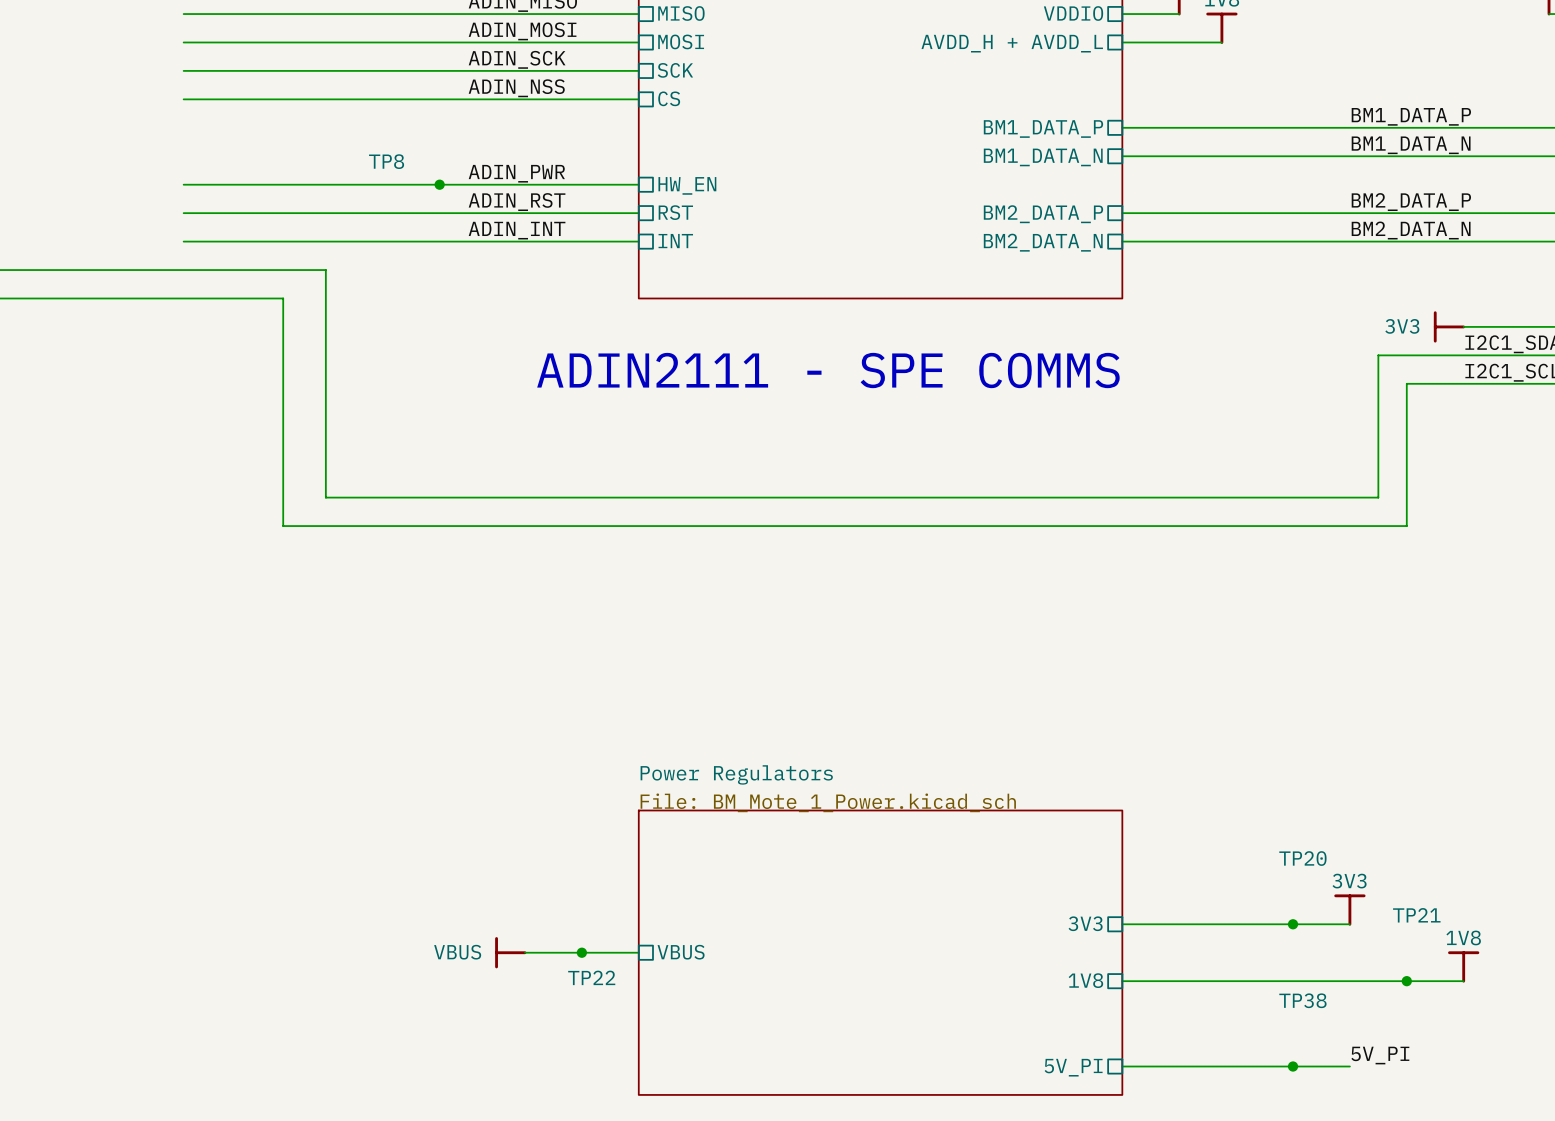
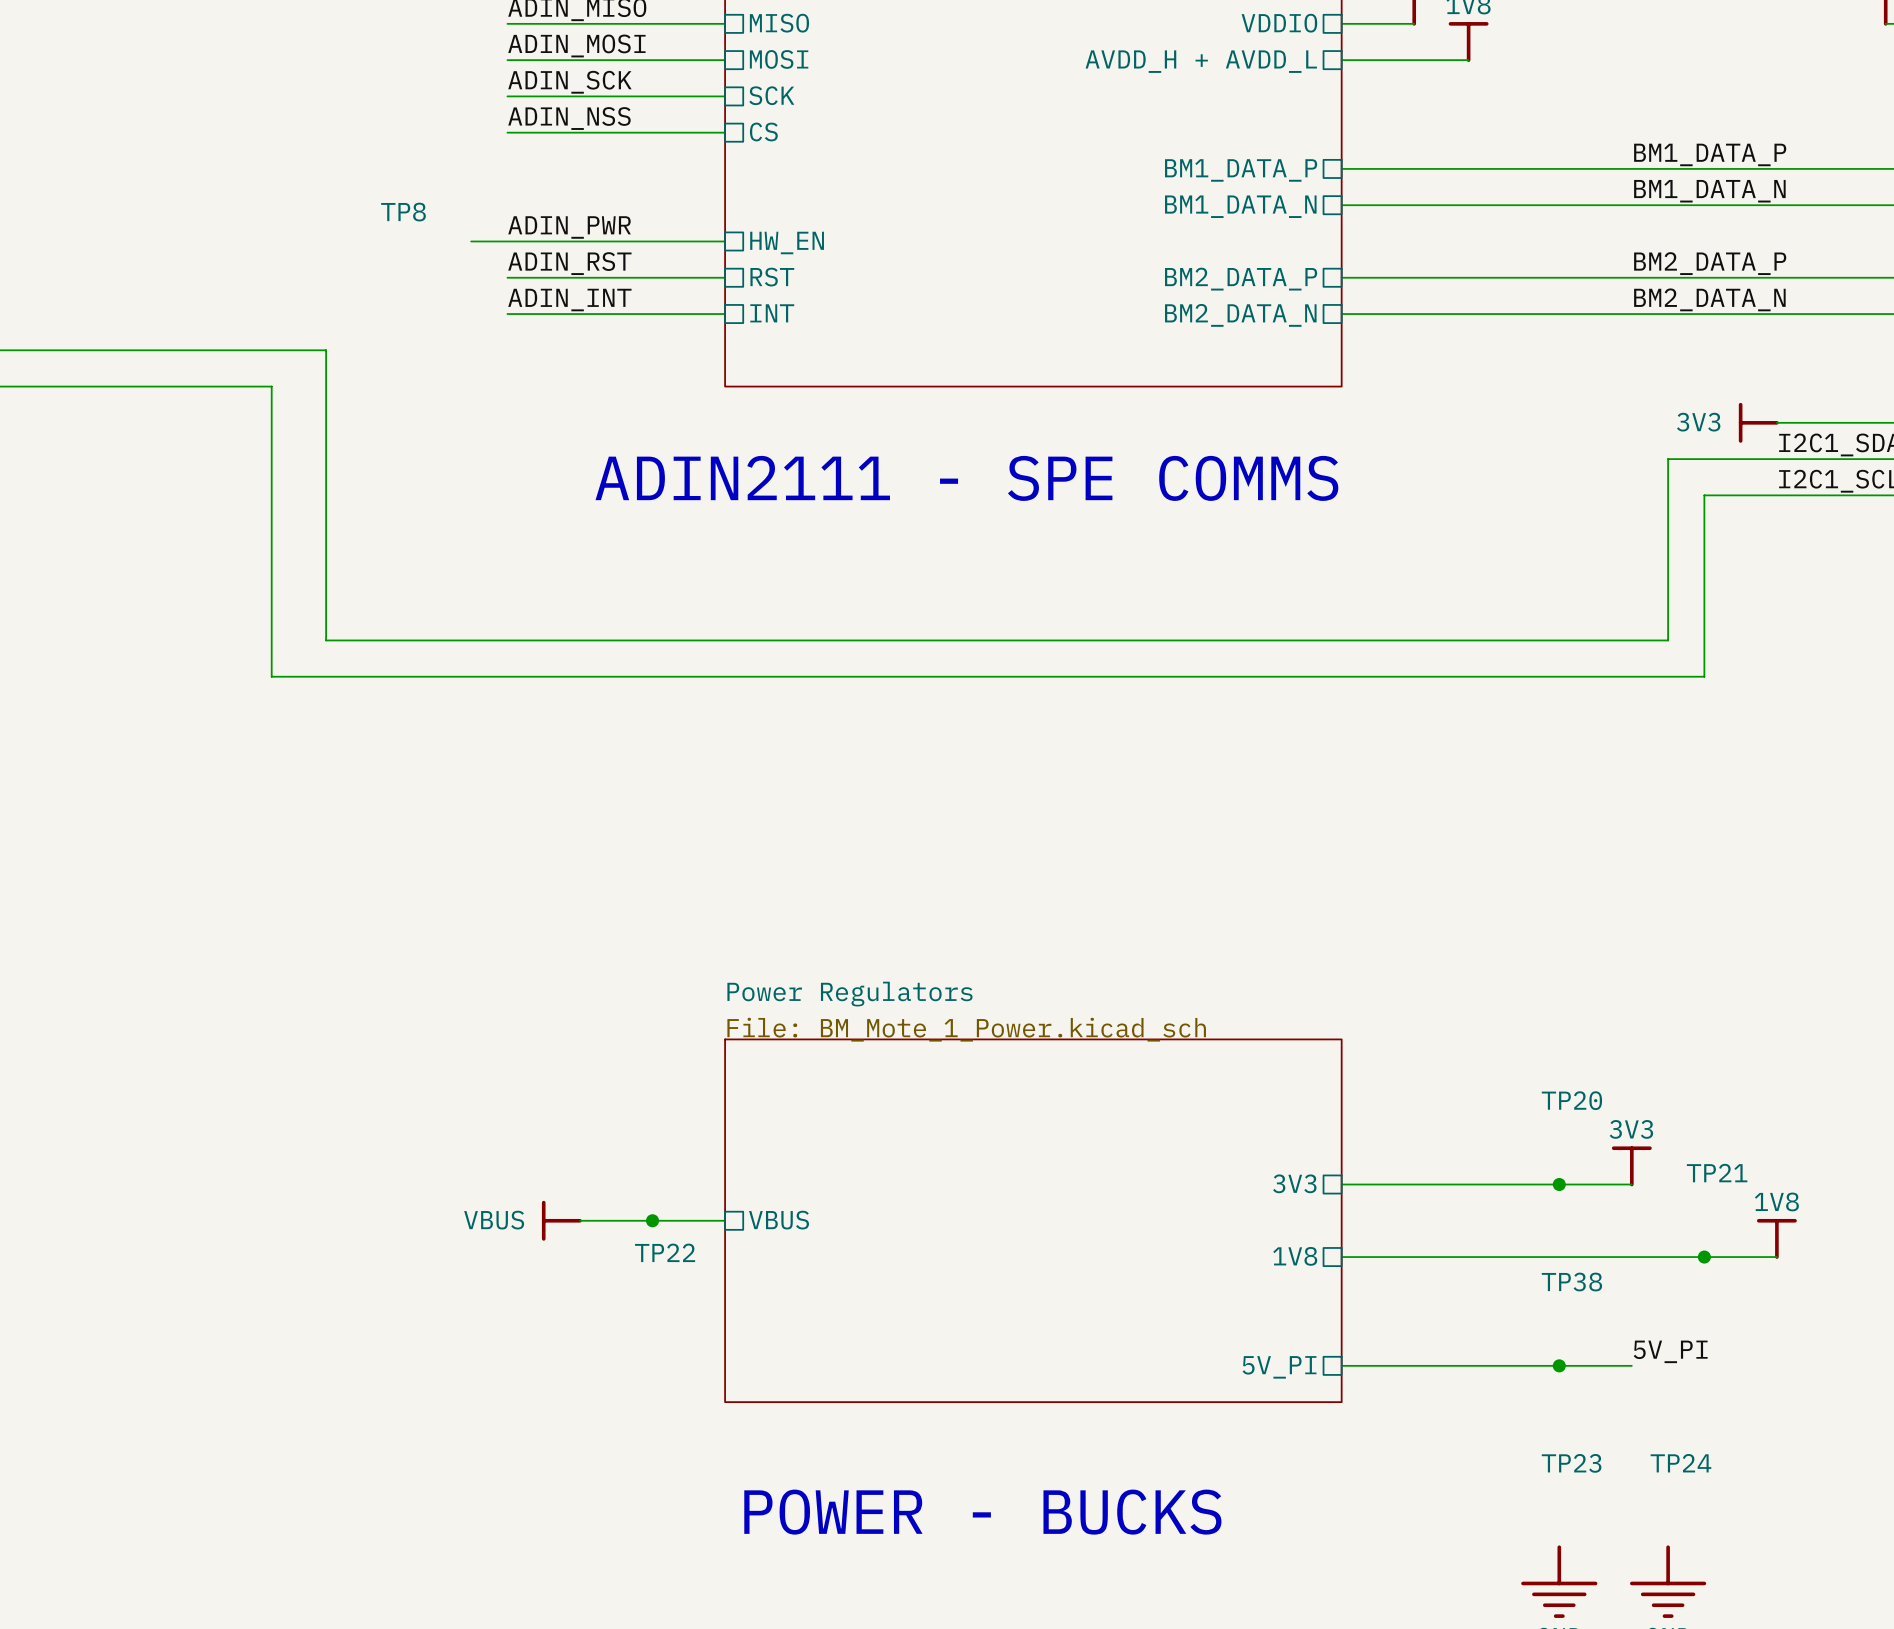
wire: (183, 14) (468, 14) -> none
wire: (183, 42) (468, 42) -> none
wire: (183, 70) (468, 70) -> none
wire: (183, 99) (468, 99) -> none
wire: (183, 184) (439, 184) -> none
junction: (439, 184) -> none
wire: (183, 213) (468, 213) -> none
wire: (183, 241) (468, 241) -> none

